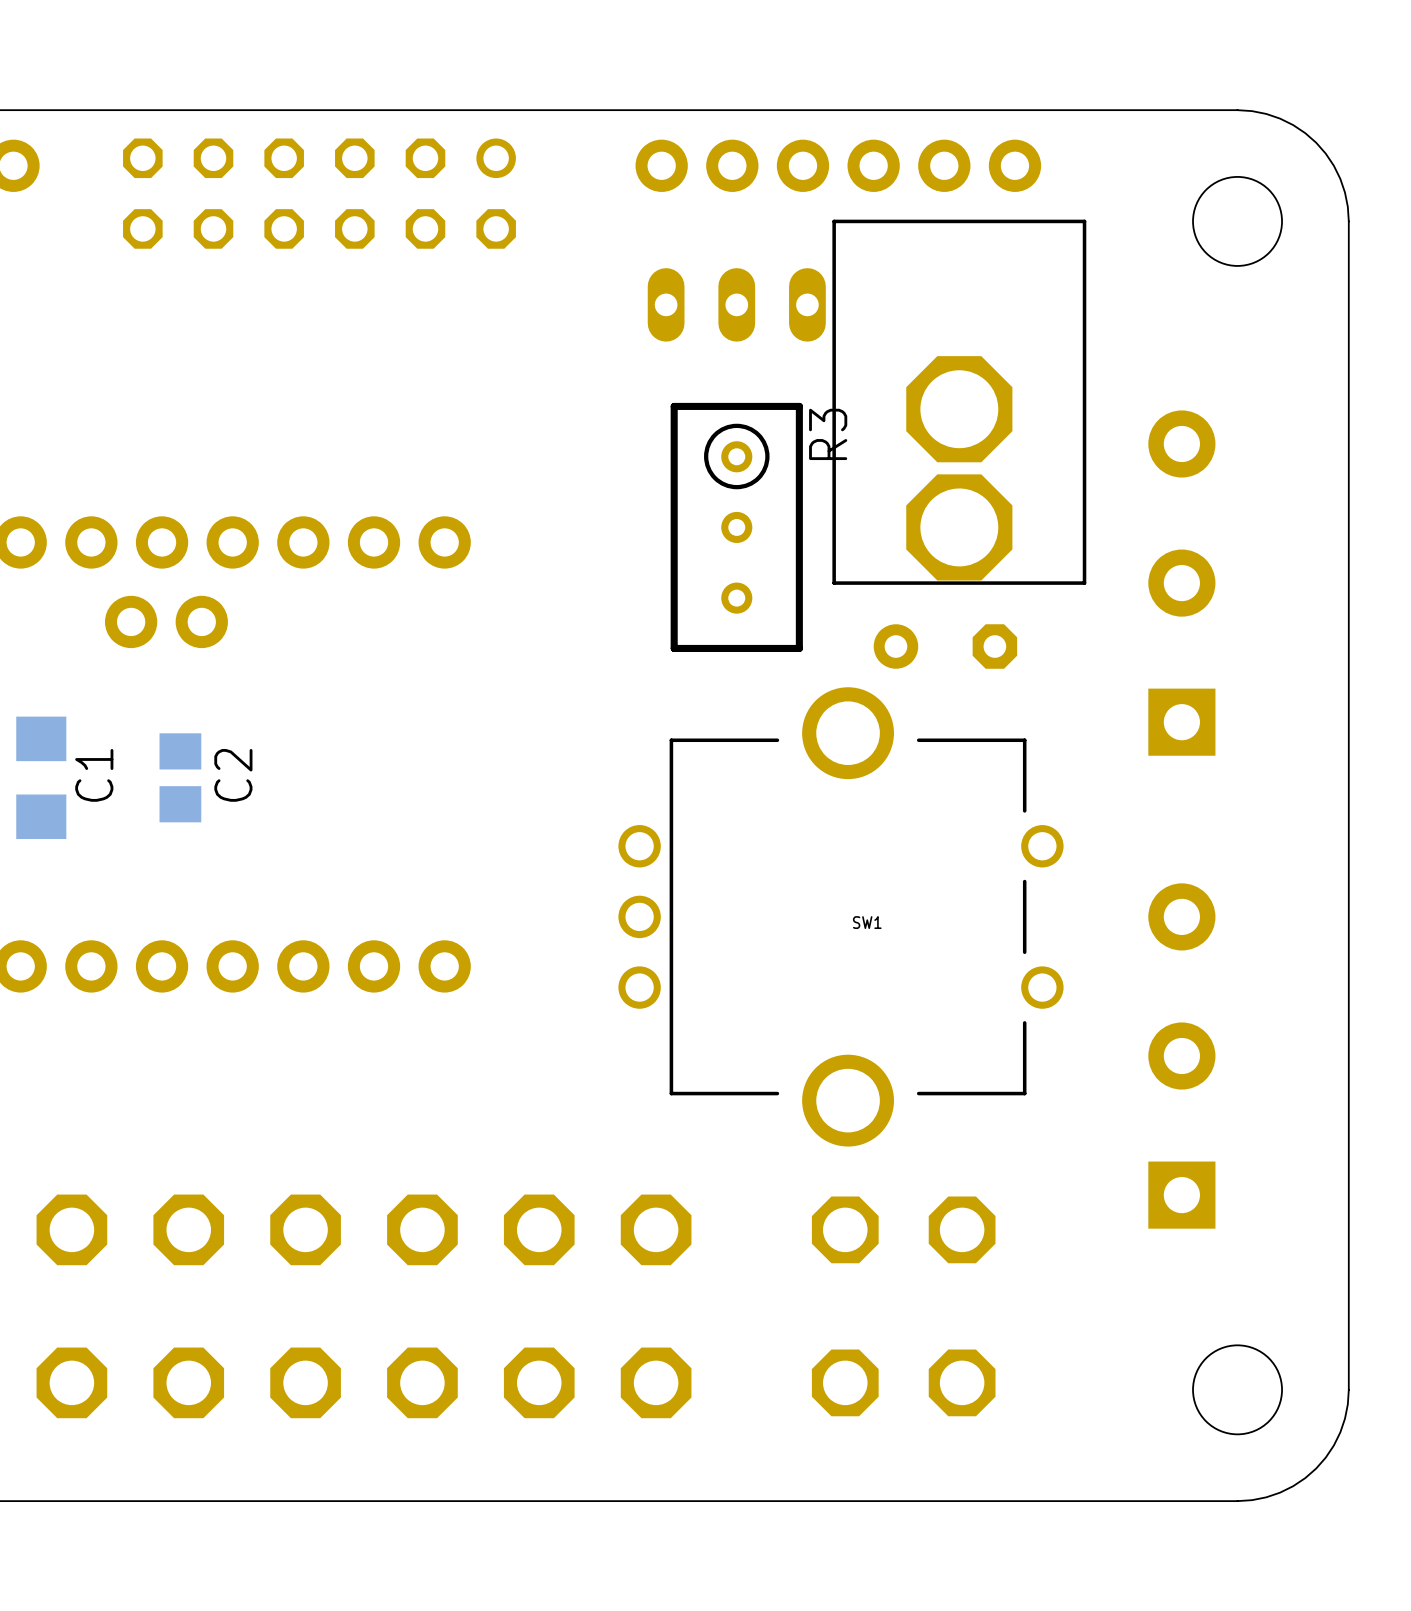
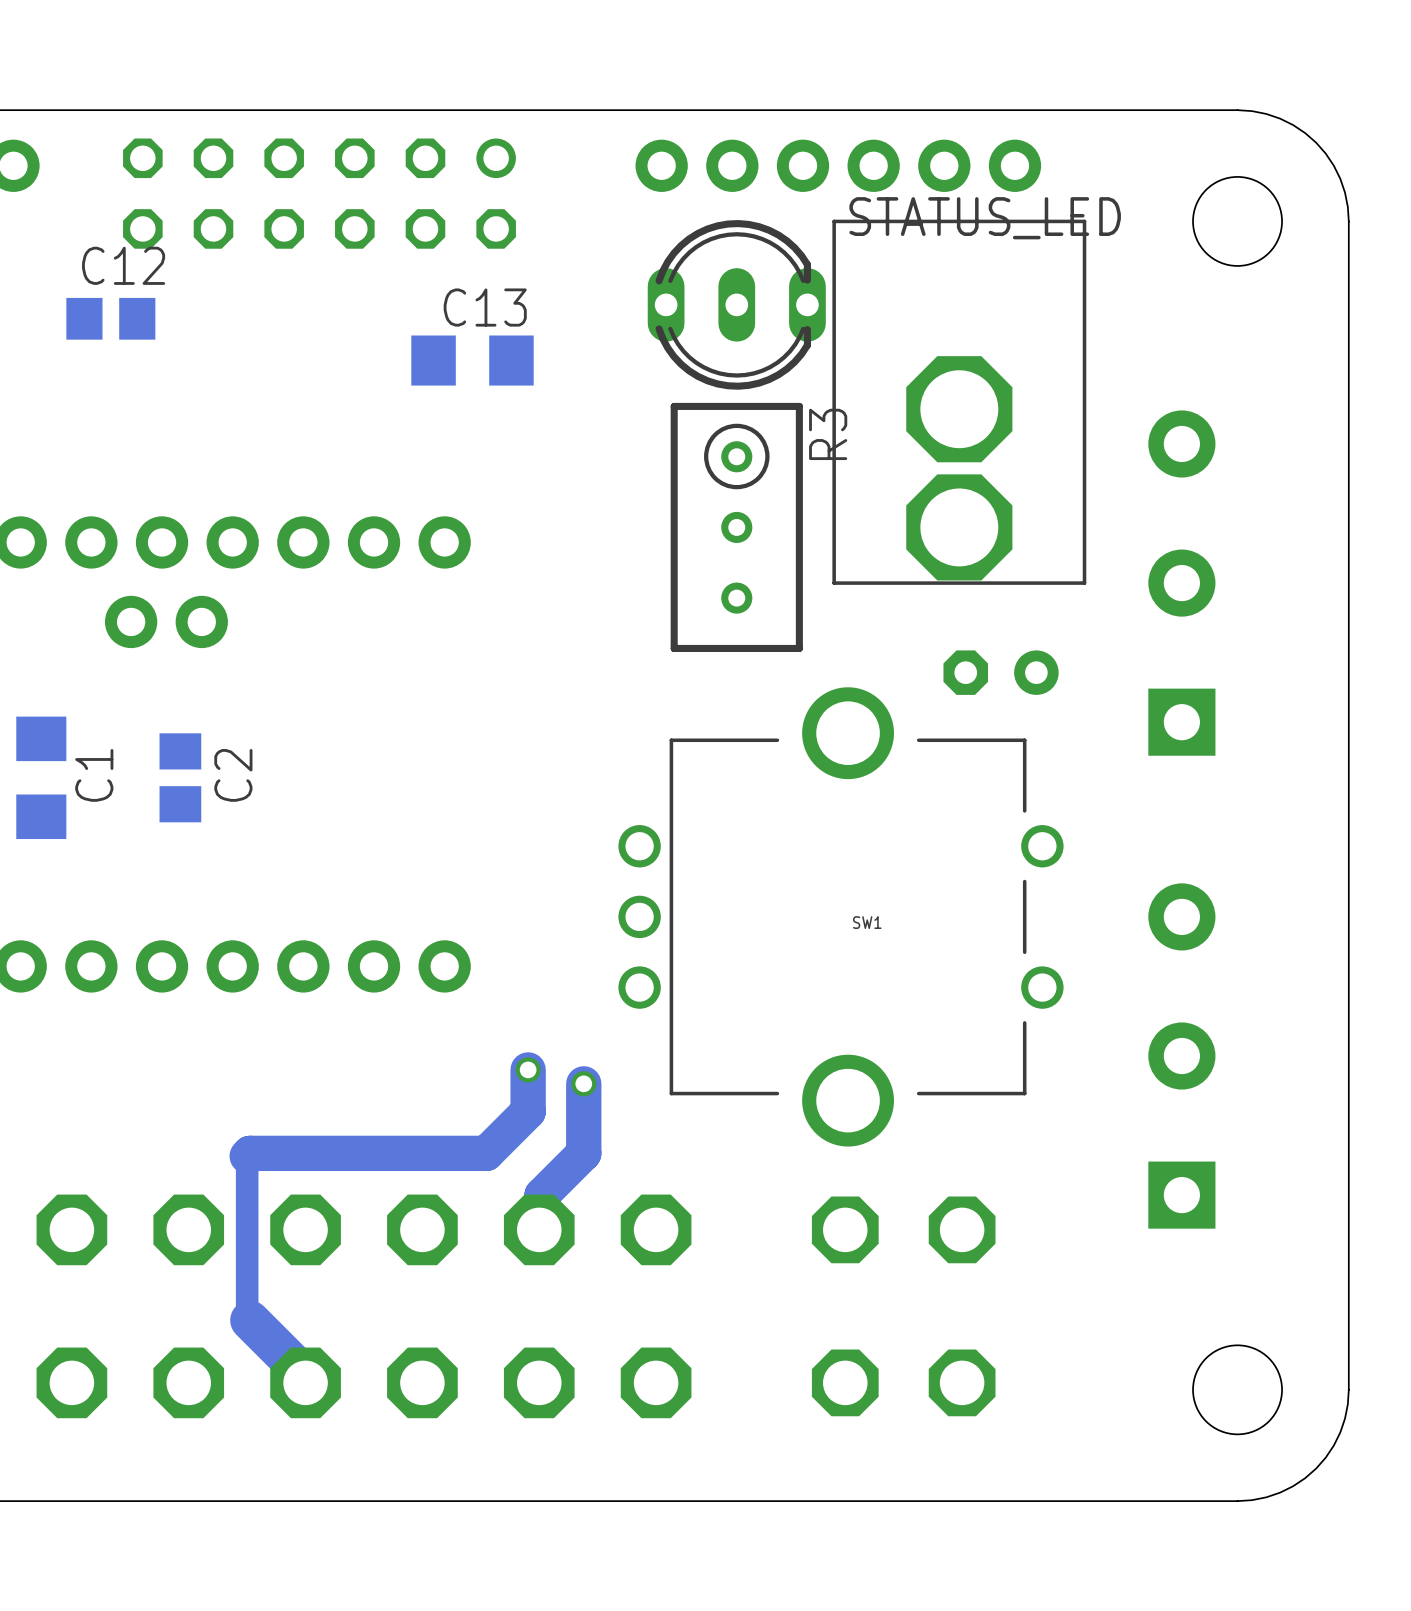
STATUS_LED side: top (736, 304) -> bottom (736, 304)
C12: none -> (110, 318)
C13: none -> (472, 360)
part: (945, 646) -> none
part: none -> (1001, 672)
track: none -> (528, 1069) (528, 1111) (486, 1153) (249, 1153) (247, 1156) (247, 1317) (305, 1375) (305, 1382)
via: none -> (528, 1069)
track: none -> (583, 1083) (583, 1153) (542, 1195) (539, 1229)
via: none -> (583, 1083)

